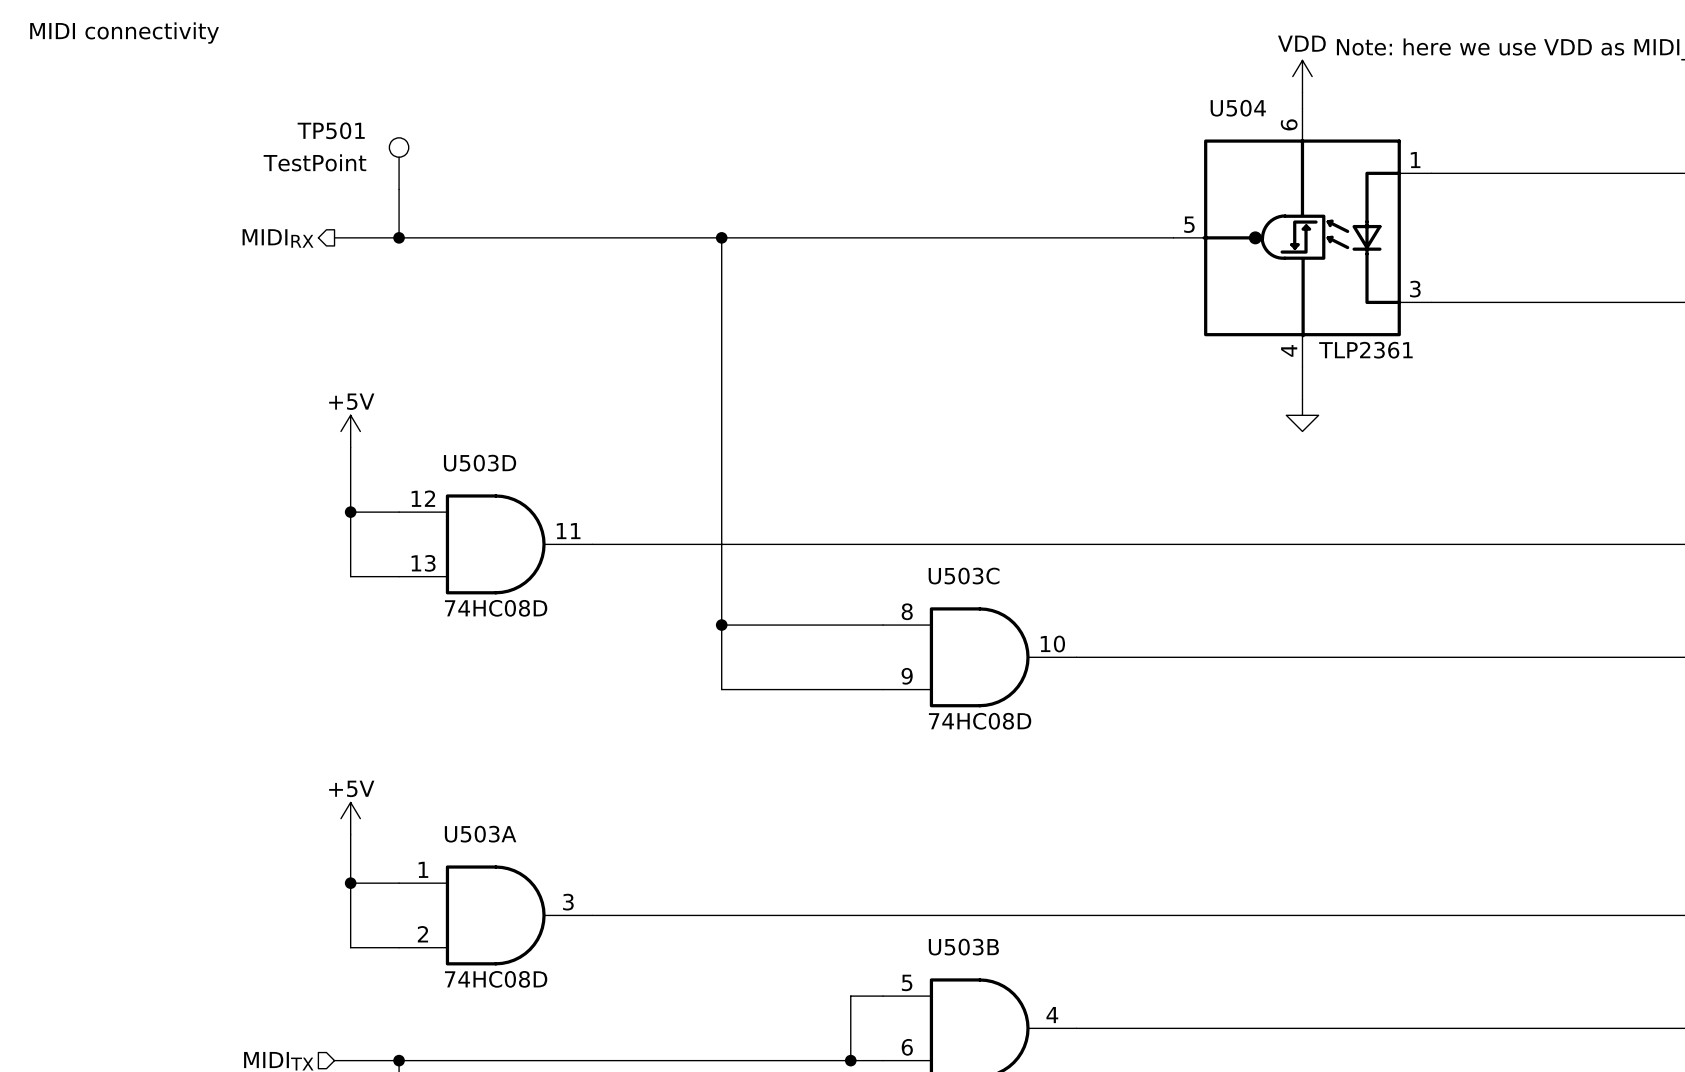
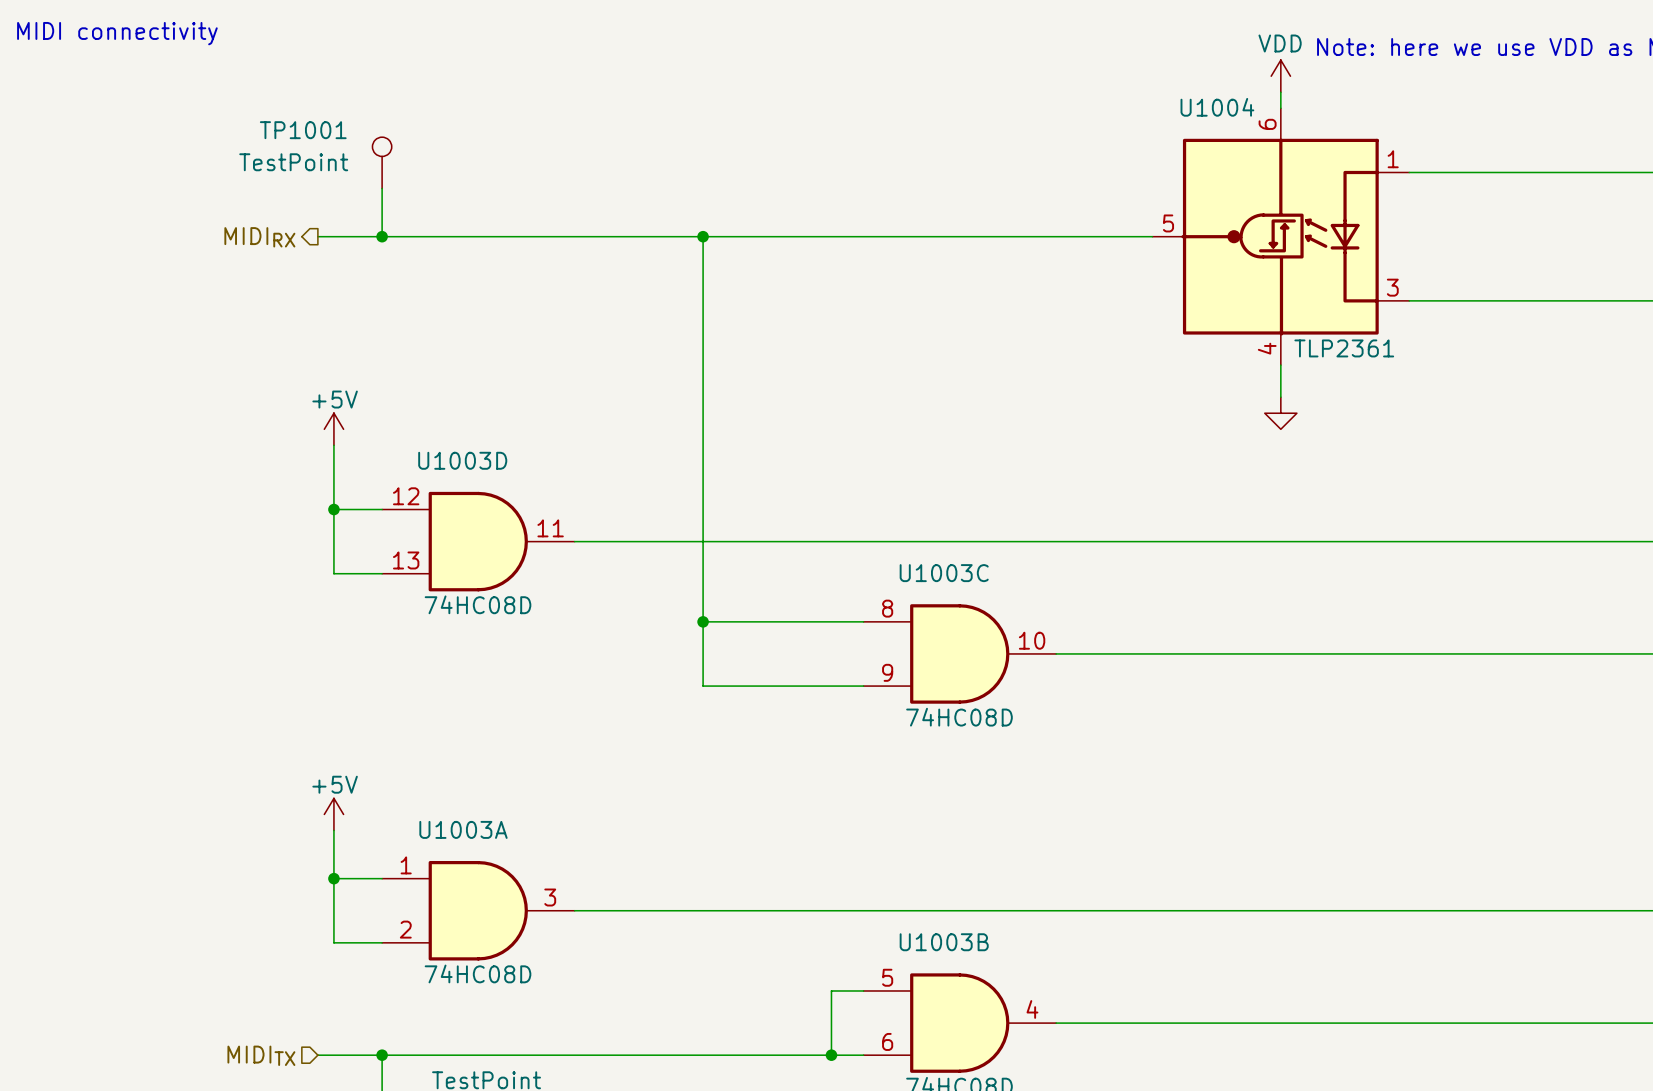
U504 name: U504 (1238, 108) -> U1004 (1217, 107)
TP501 name: TP501 (331, 130) -> TP1001 (303, 130)
U503D name: U503D (480, 463) -> U1003D (462, 460)
U503C name: U503C (964, 576) -> U1003C (944, 573)
U503A name: U503A (480, 834) -> U1003A (463, 829)
U503B name: U503B (963, 947) -> U1003B (944, 942)

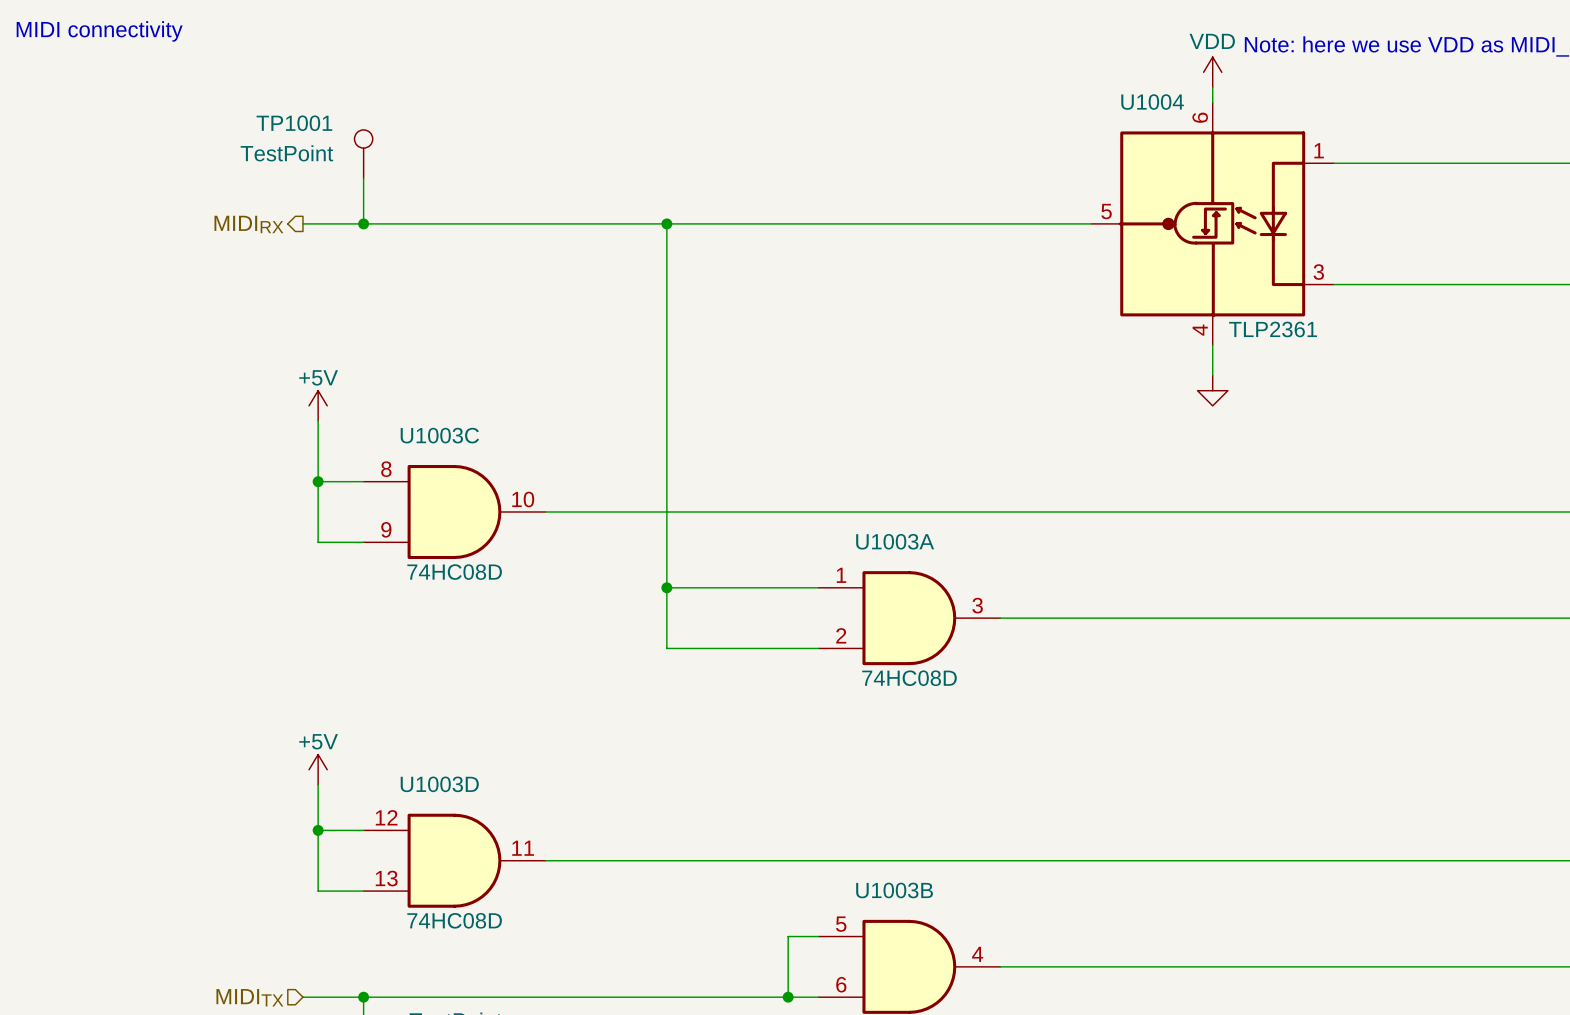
U1003D position: (478, 541) -> (454, 860)
U1003C position: (959, 653) -> (454, 512)
U1003A position: (478, 910) -> (909, 618)

